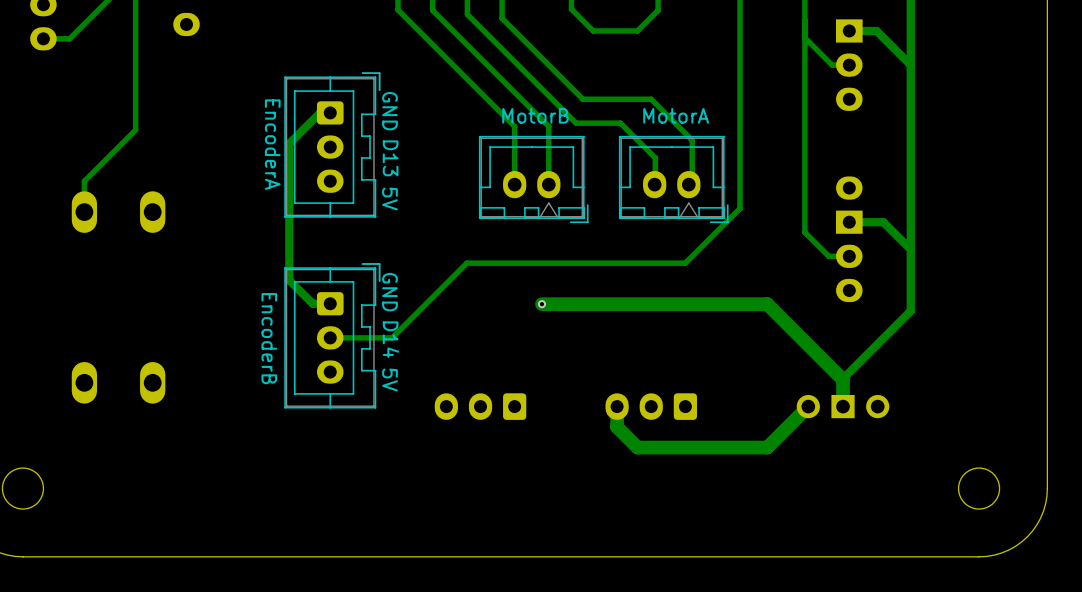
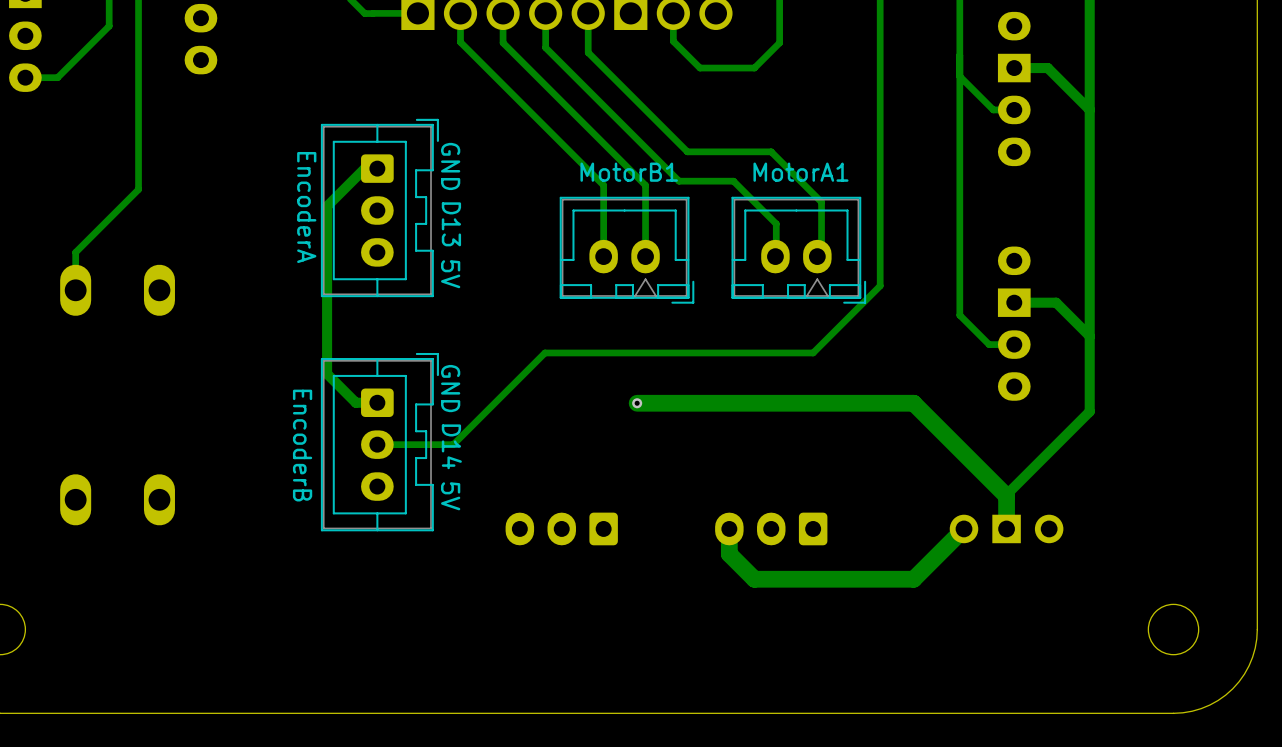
MotorB name: MotorB (535, 115) -> MotorB1 (629, 172)
MotorA name: MotorA (676, 115) -> MotorA1 (800, 172)

